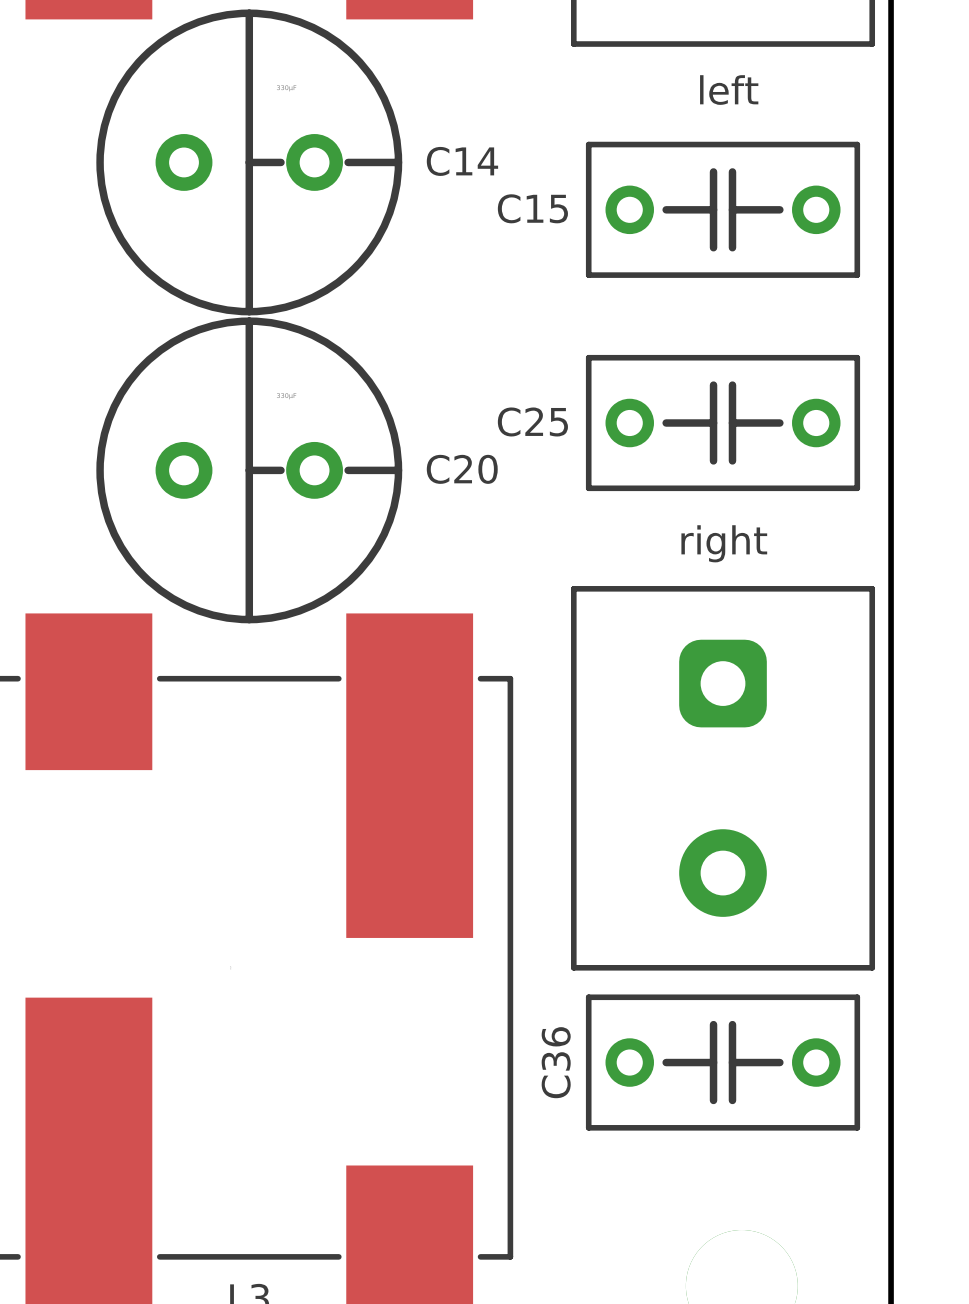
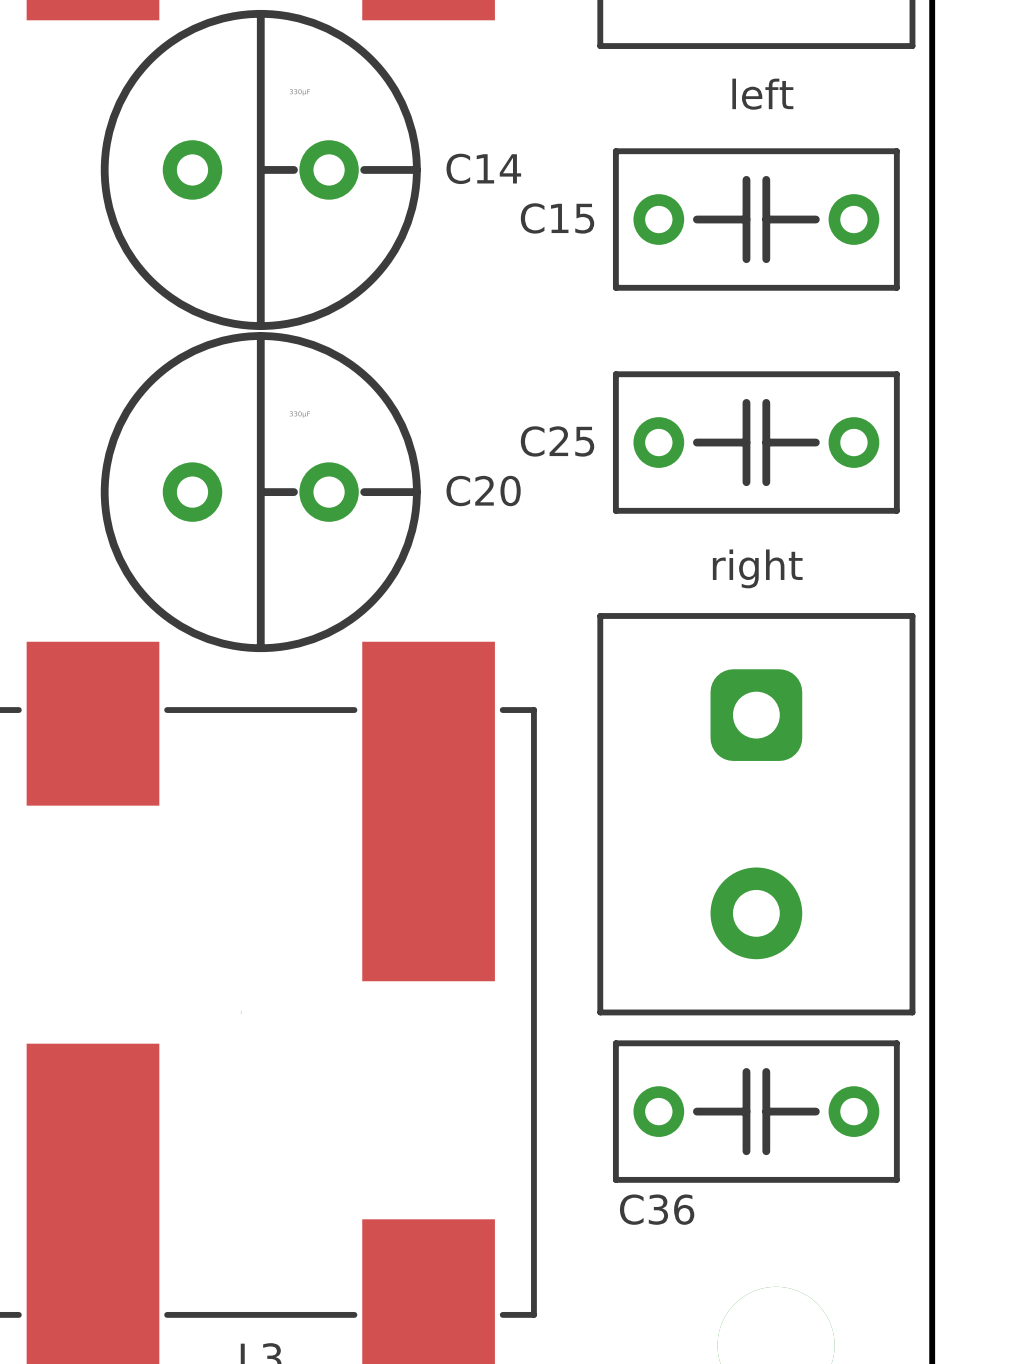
C36 name rotation: 0° (556, 1062) -> 90° clockwise (657, 1209)
C36 name position: C36 (556, 1062) -> C36 (657, 1209)

